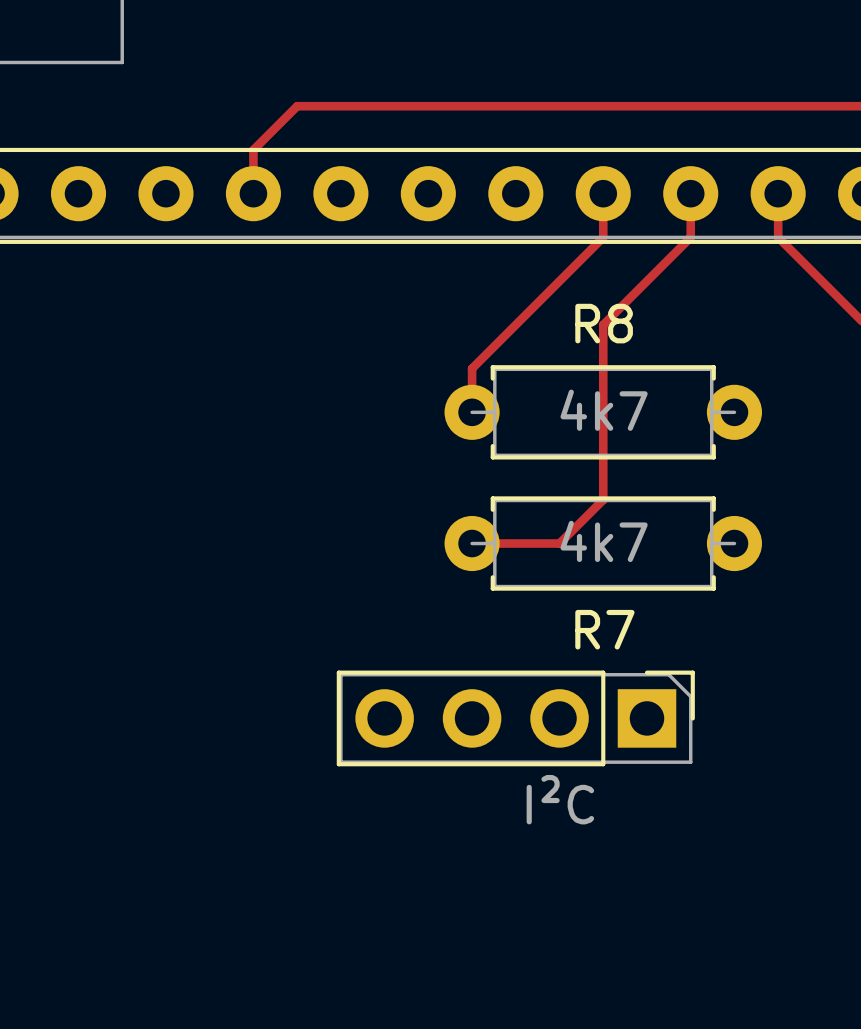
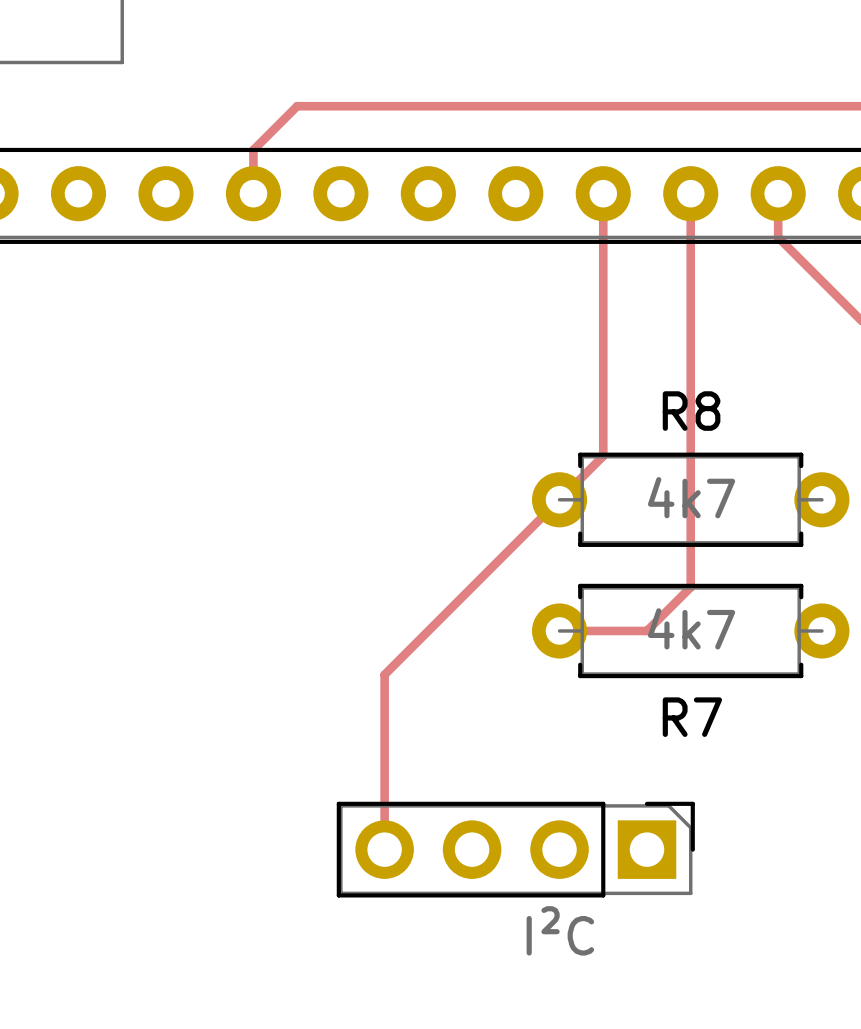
track: (603, 237) (472, 368) (472, 412) -> none
track: (690, 237) (603, 324) -> (603, 237) (603, 324)
track: none -> (690, 237) (690, 587) (647, 630) (559, 630)
R8 position: (603, 412) -> (690, 499)
track: (603, 456) (603, 499) (559, 543) (472, 543) -> (603, 456) (384, 674) (384, 849)
R7 position: (603, 543) -> (690, 630)
part position: (515, 718) -> (515, 849)

